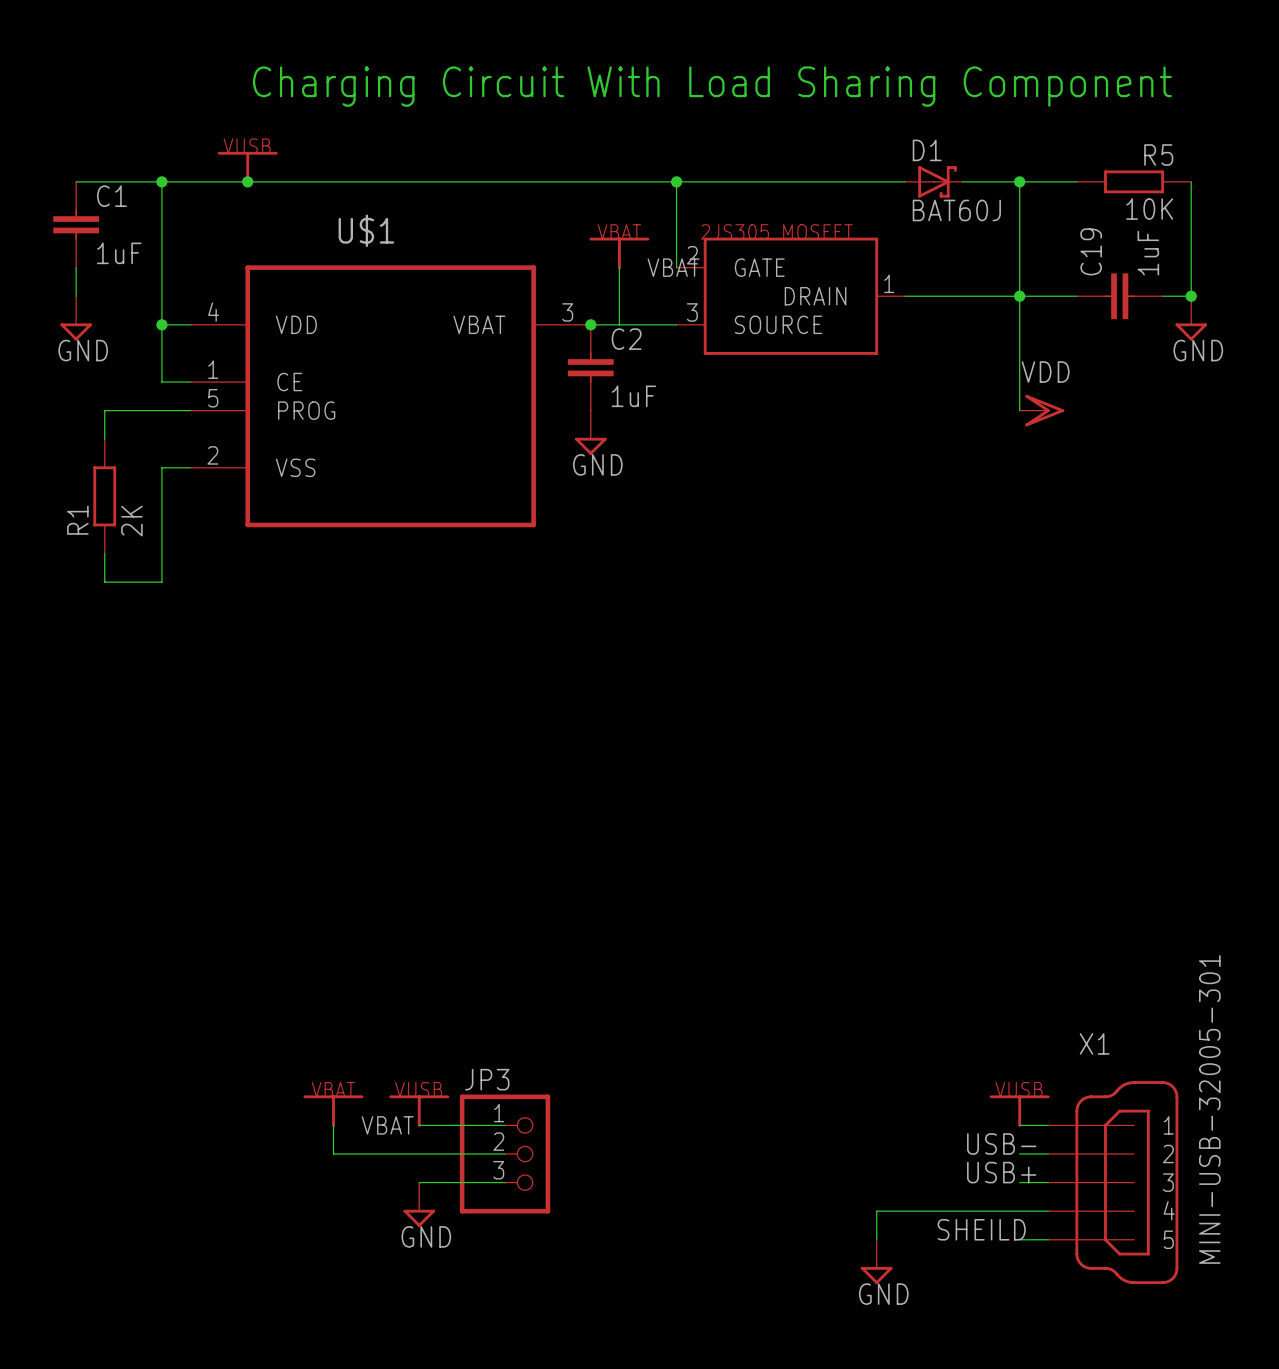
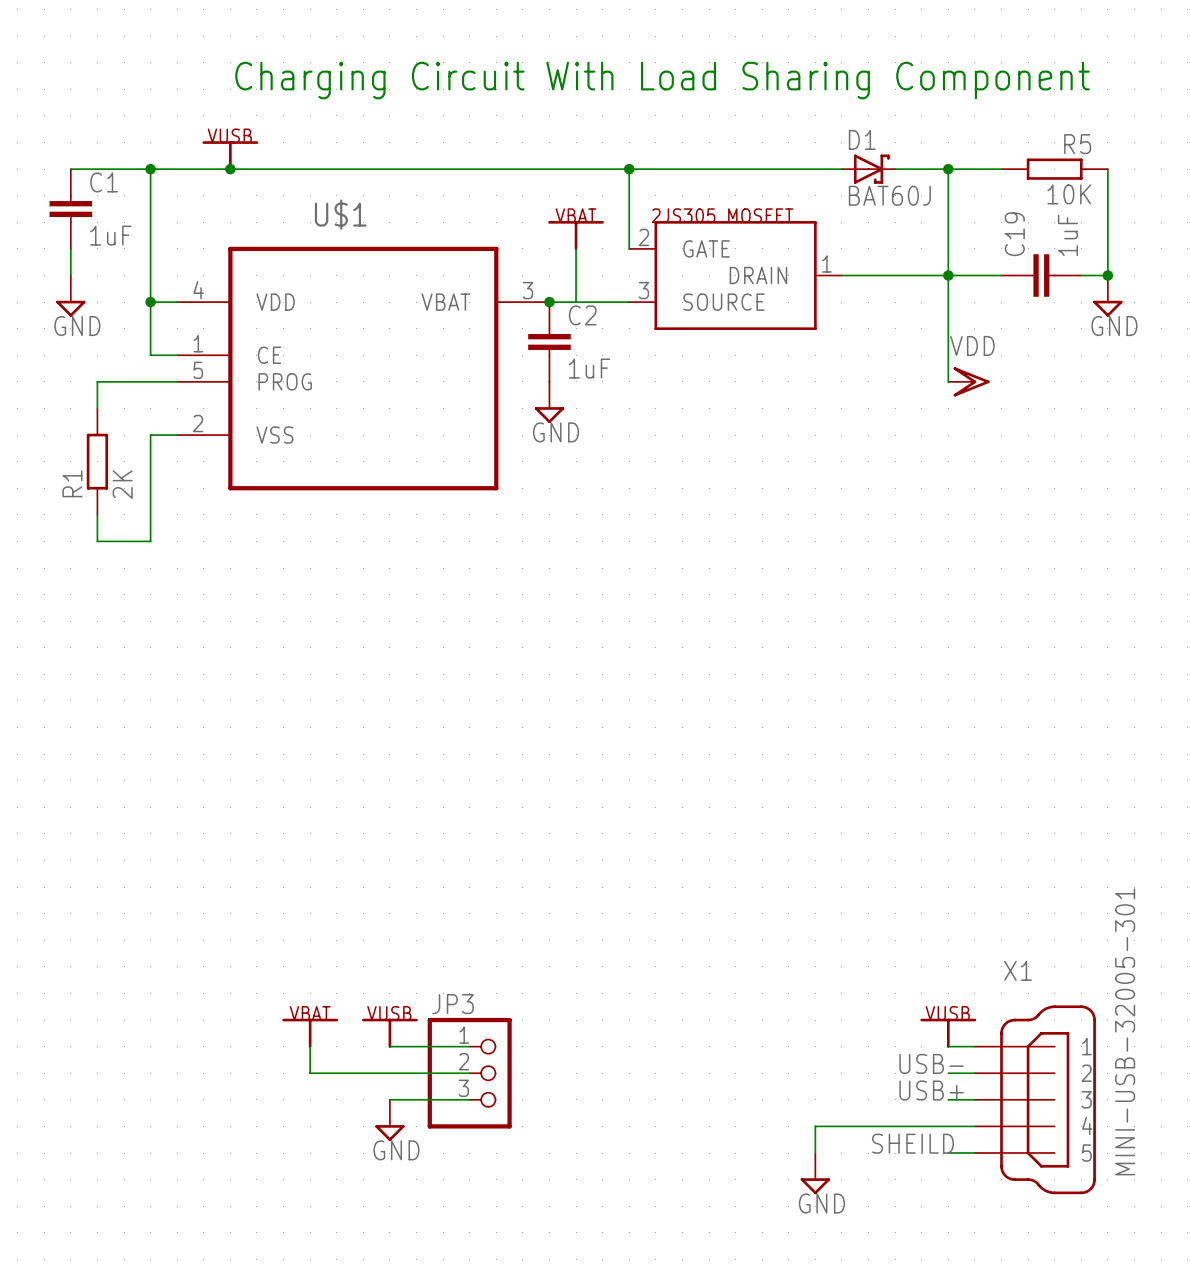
power symbol pin name: VBAT (673, 267) -> none
power symbol pin name: VBAT (387, 1125) -> none

